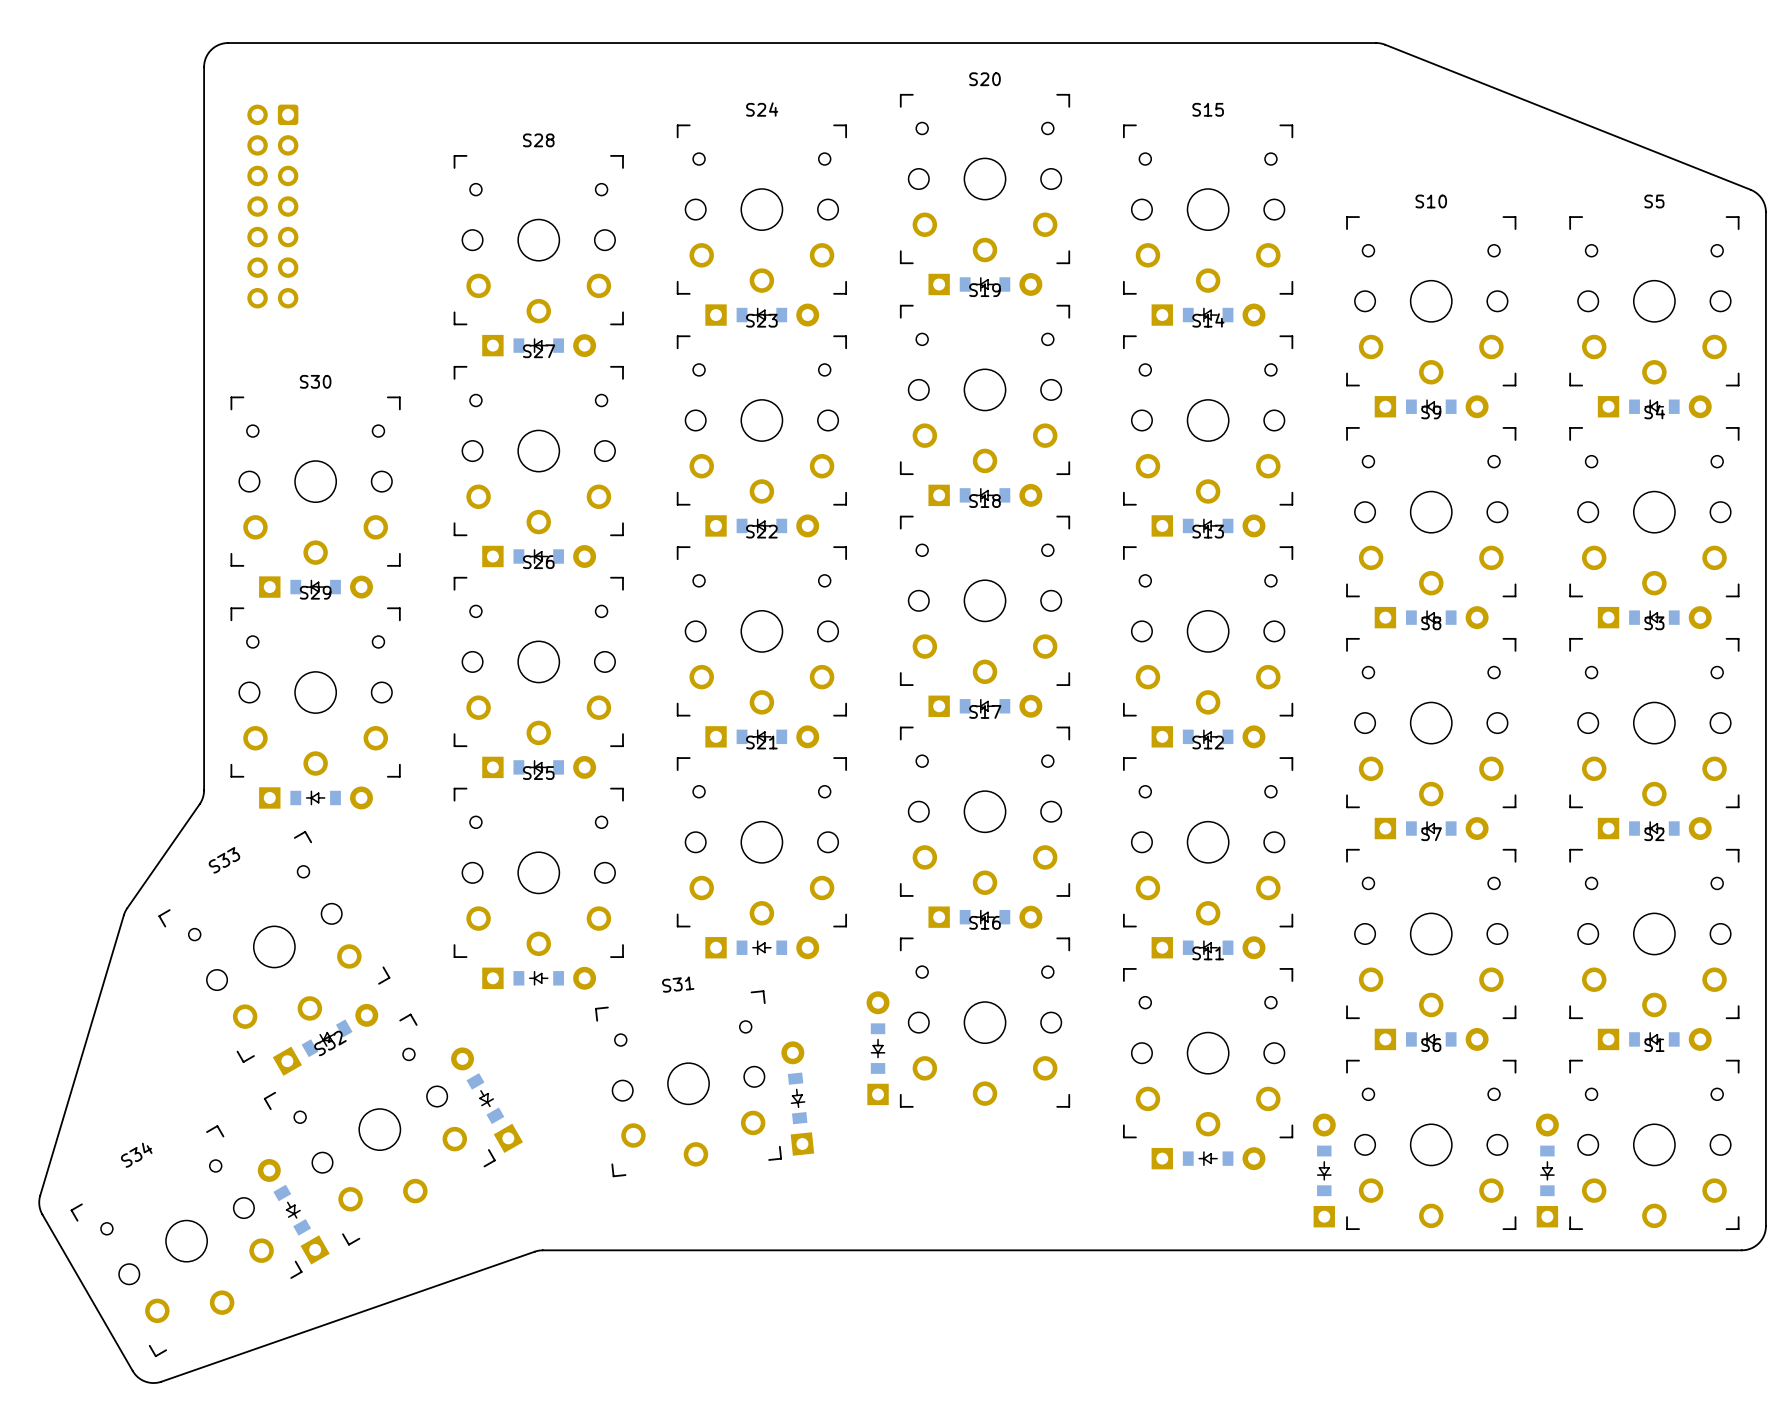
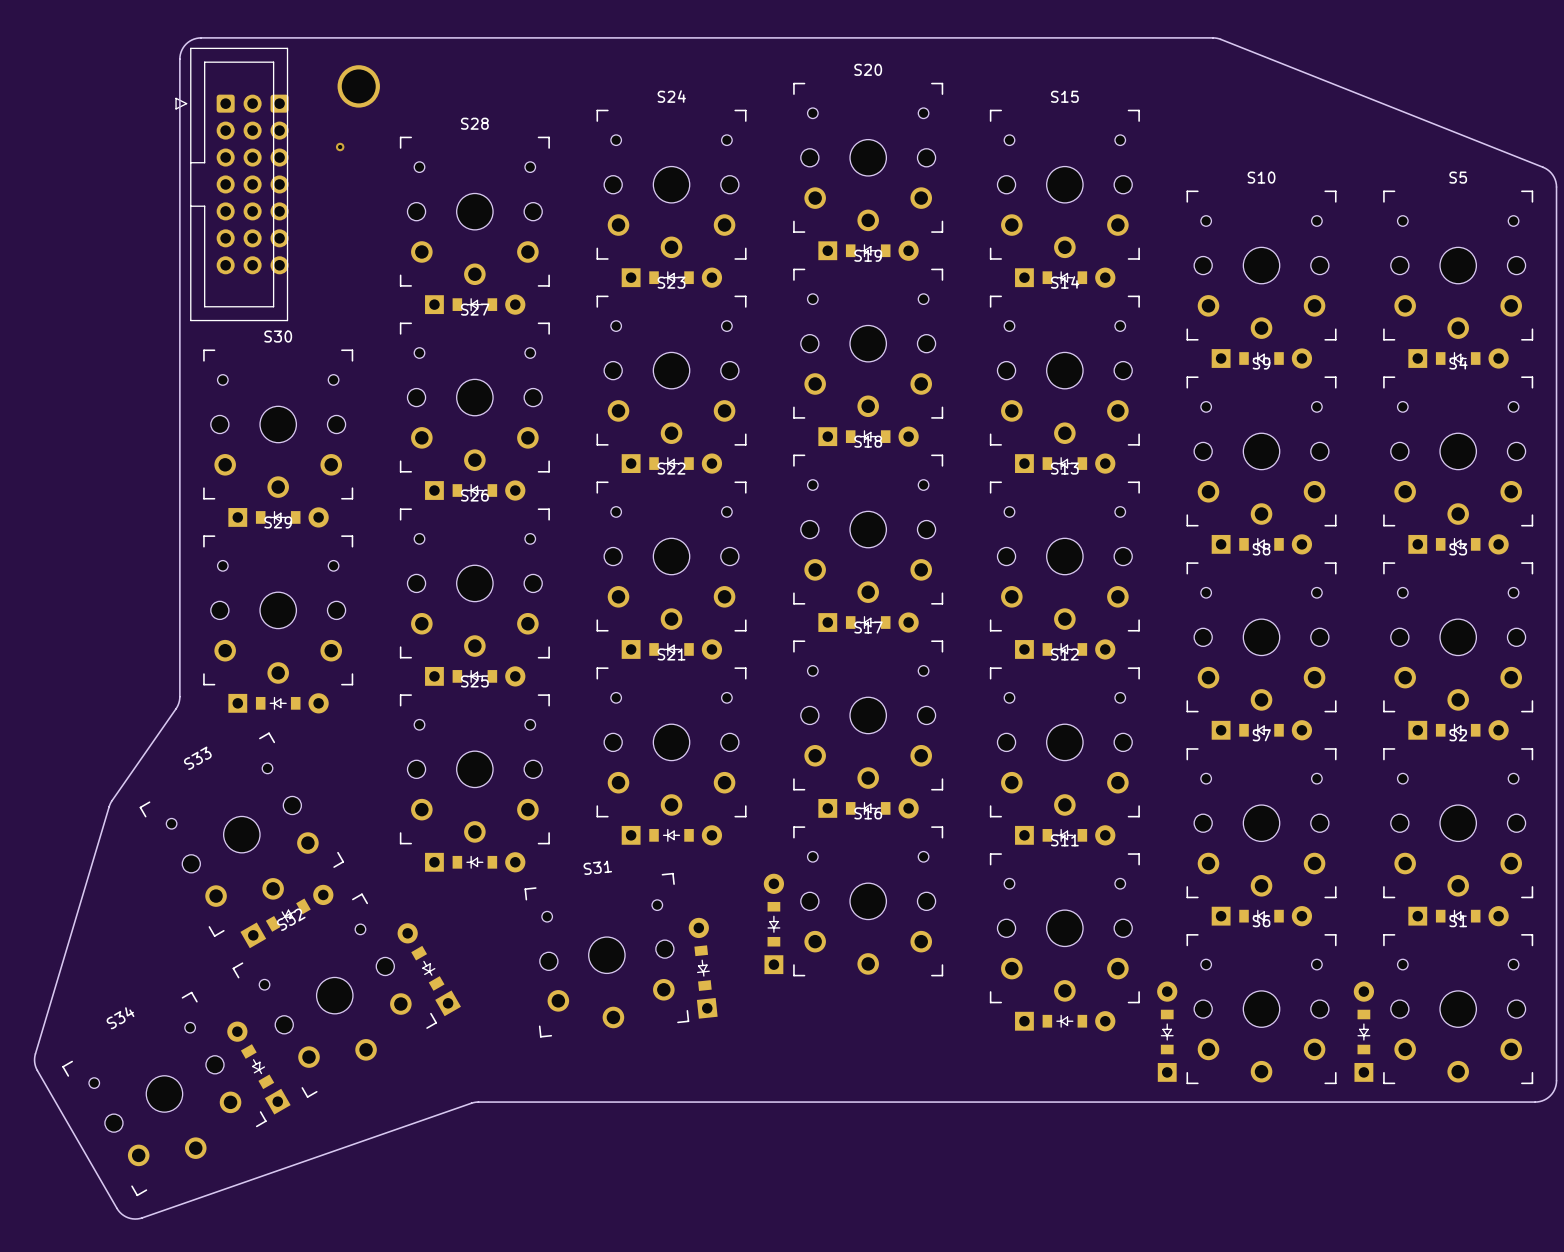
part: none -> (358, 86)
part footprint: [247, 104, 299, 309] -> [175, 47, 289, 322]
via: none -> (340, 147)

